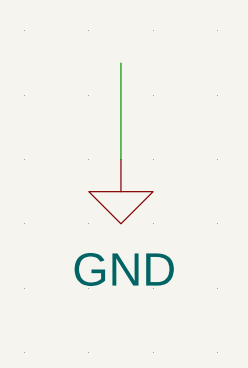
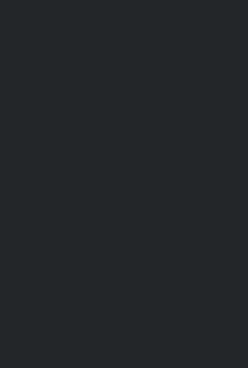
wire: (120, 63) (120, 159) -> none
power symbol: GND (120, 191) -> none

